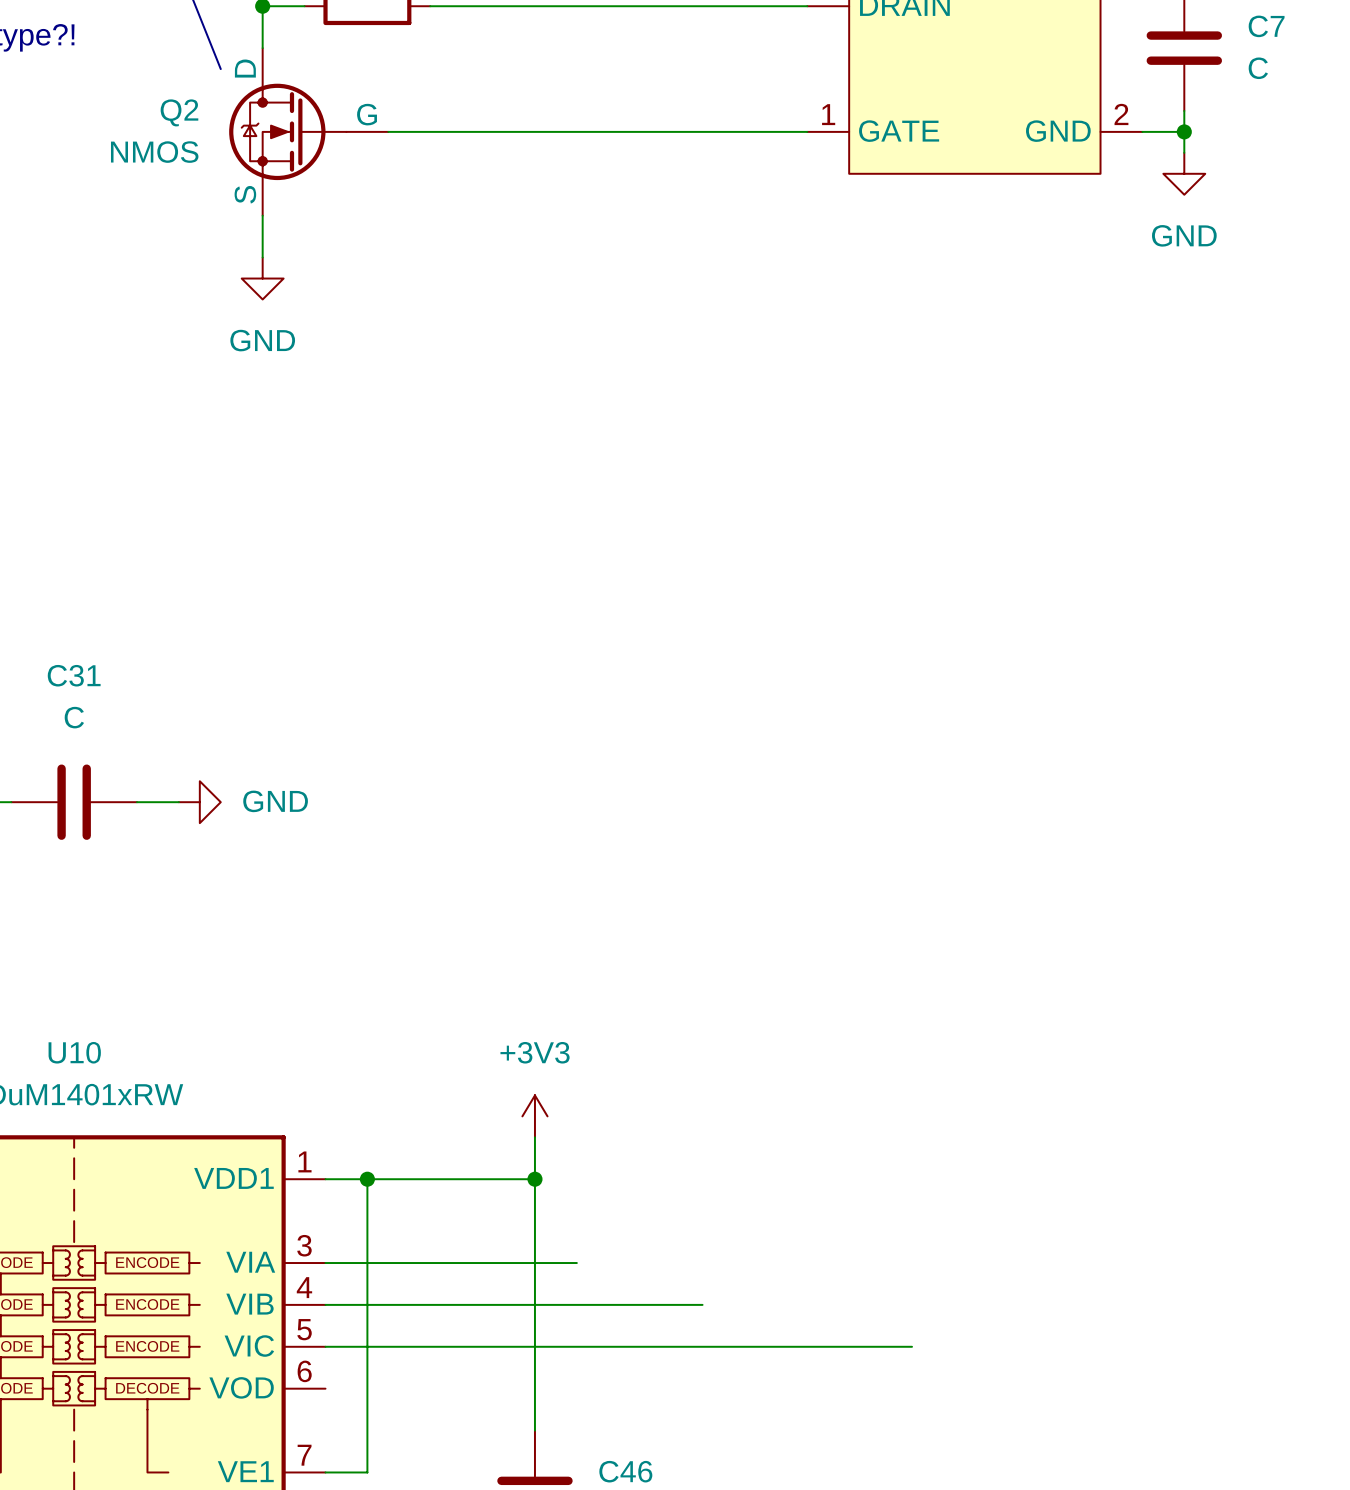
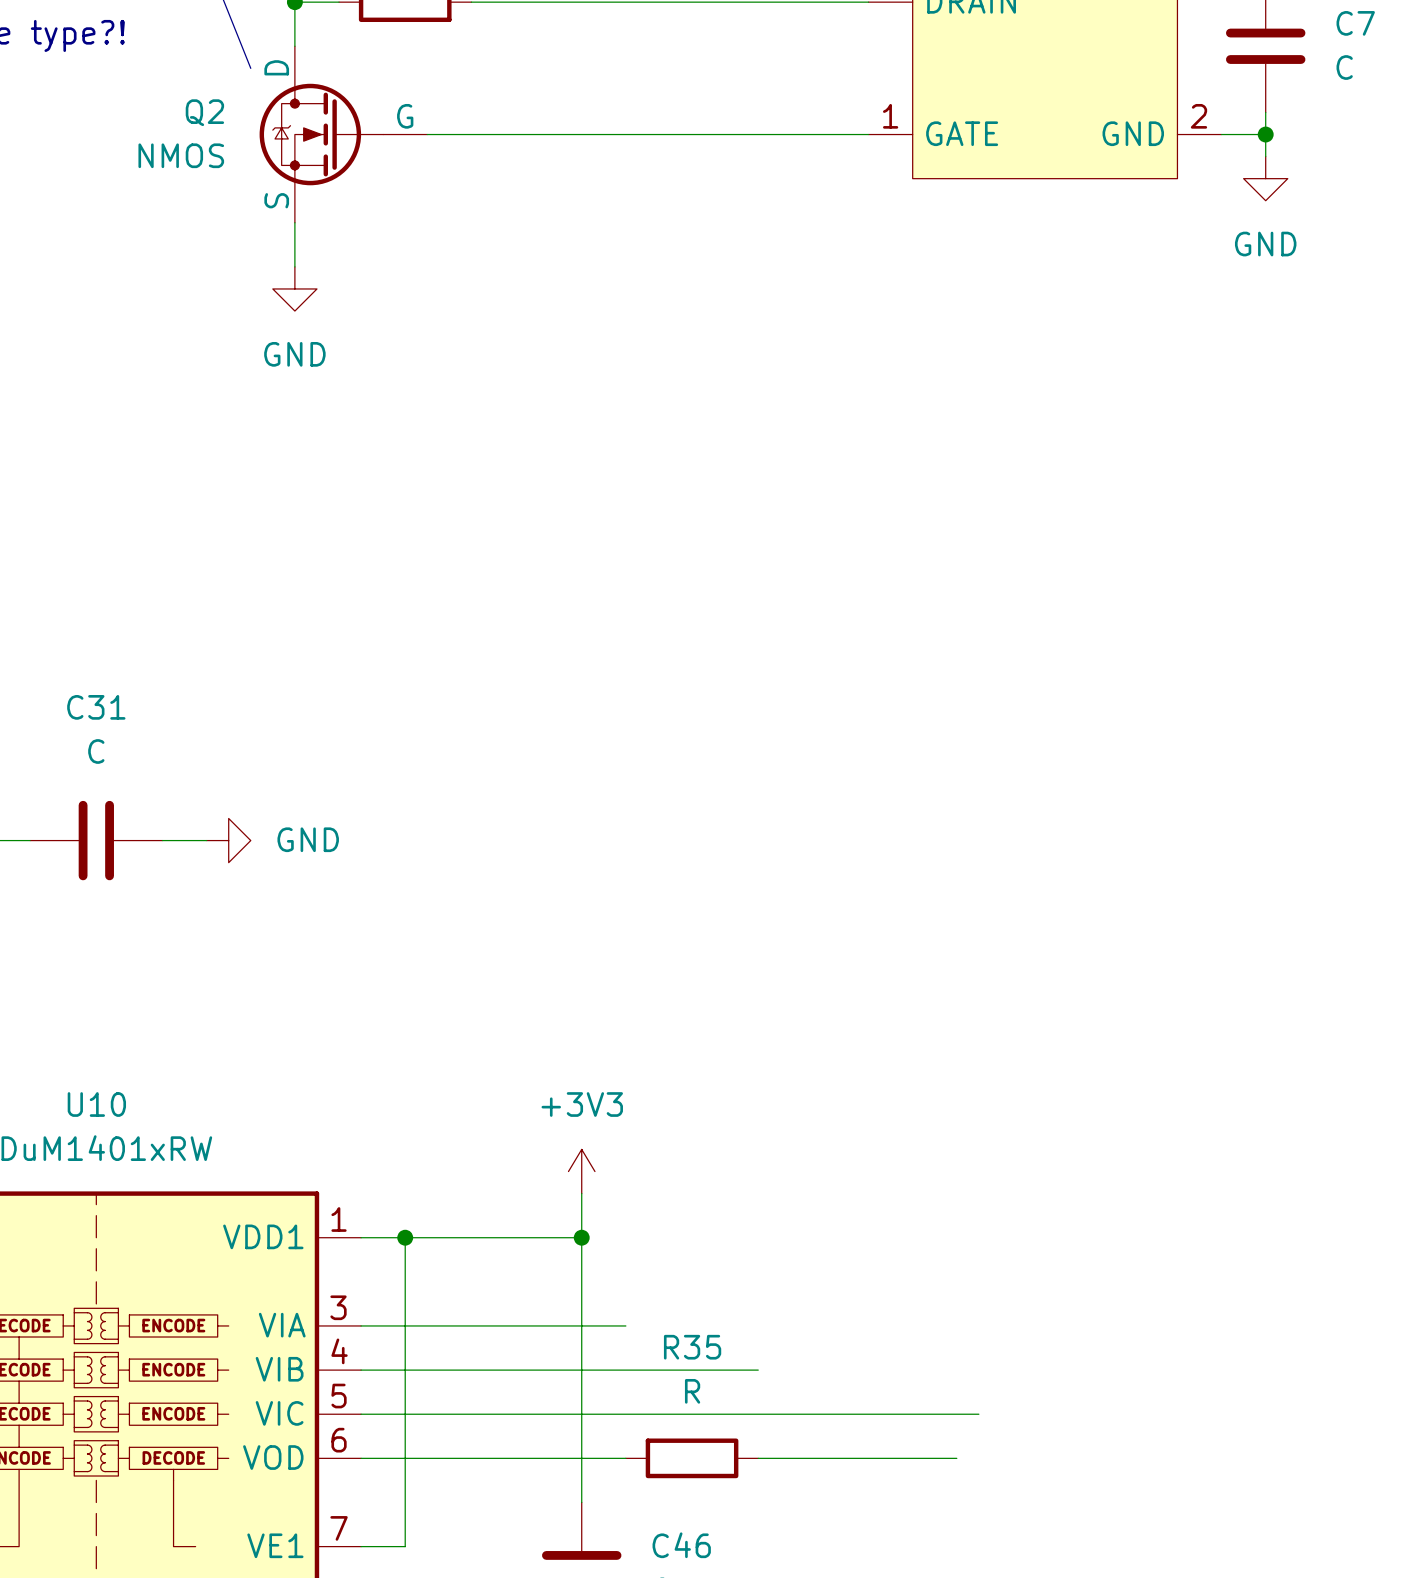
wire: none -> (361, 1458) (625, 1458)
R35: none -> R (692, 1458)
wire: none -> (758, 1458) (956, 1458)

